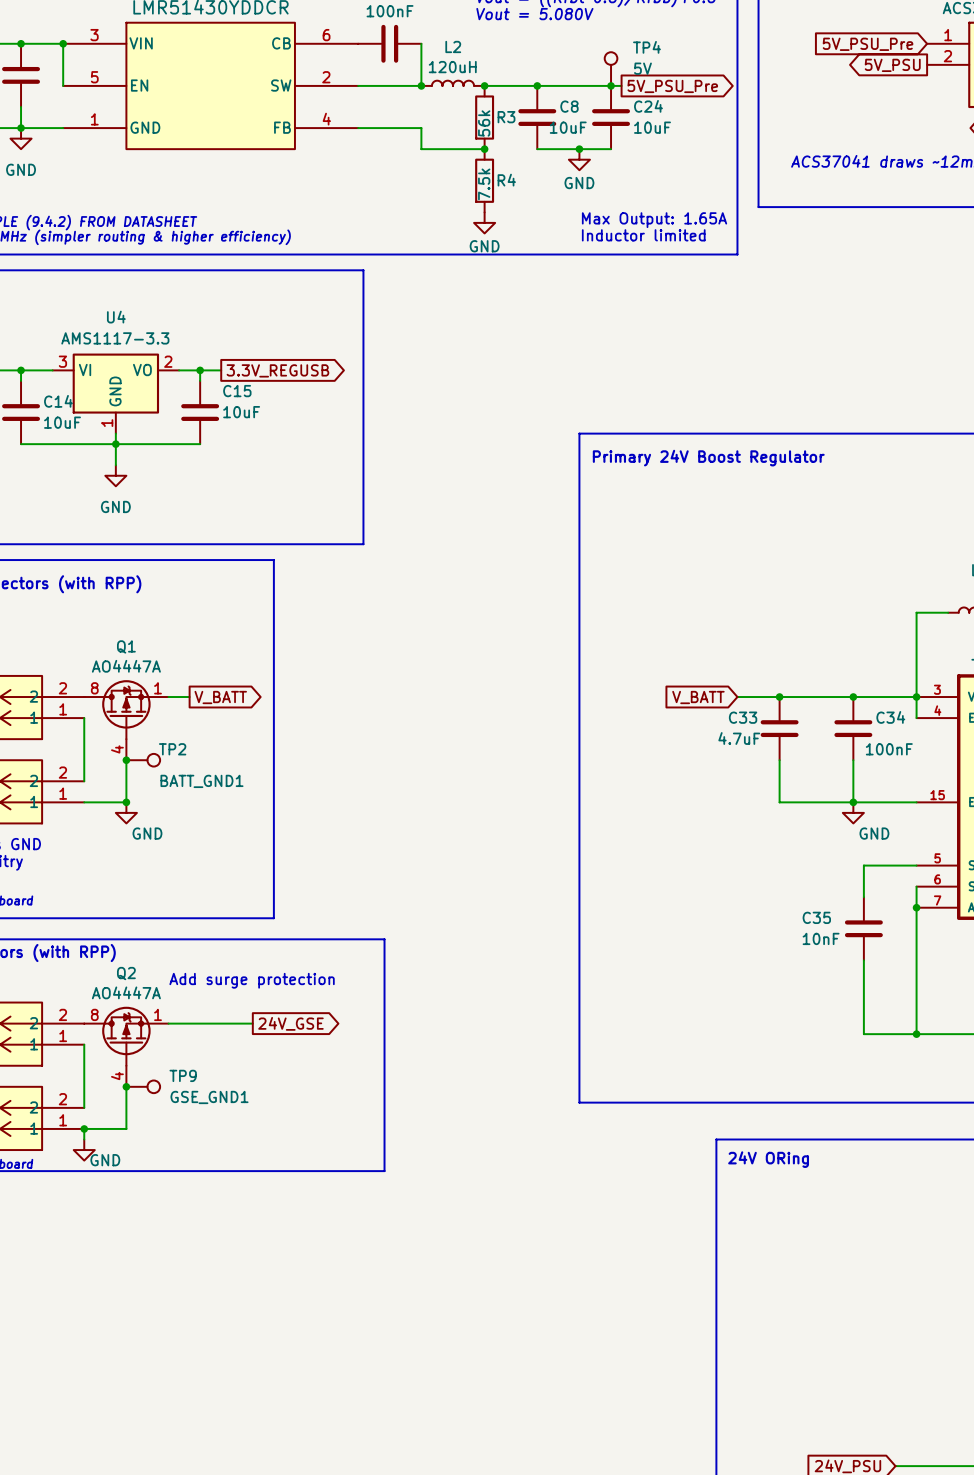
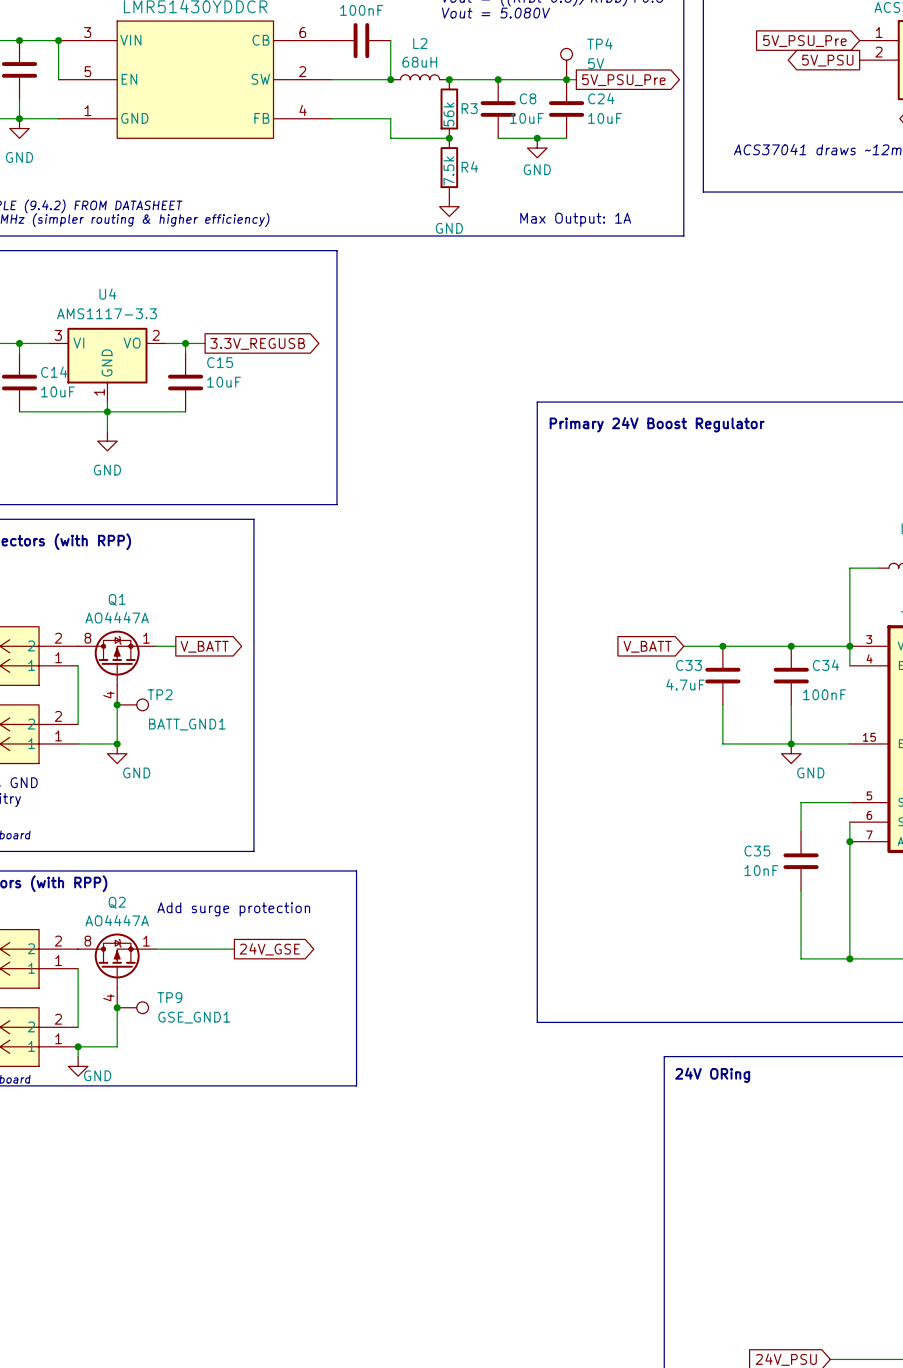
L2 value: 120uH (452, 67) -> 68uH (419, 62)
text: Max Output: 1.65A (654, 220) -> Max Output: 1A (575, 219)
text: Inductor limited (643, 235) -> none

